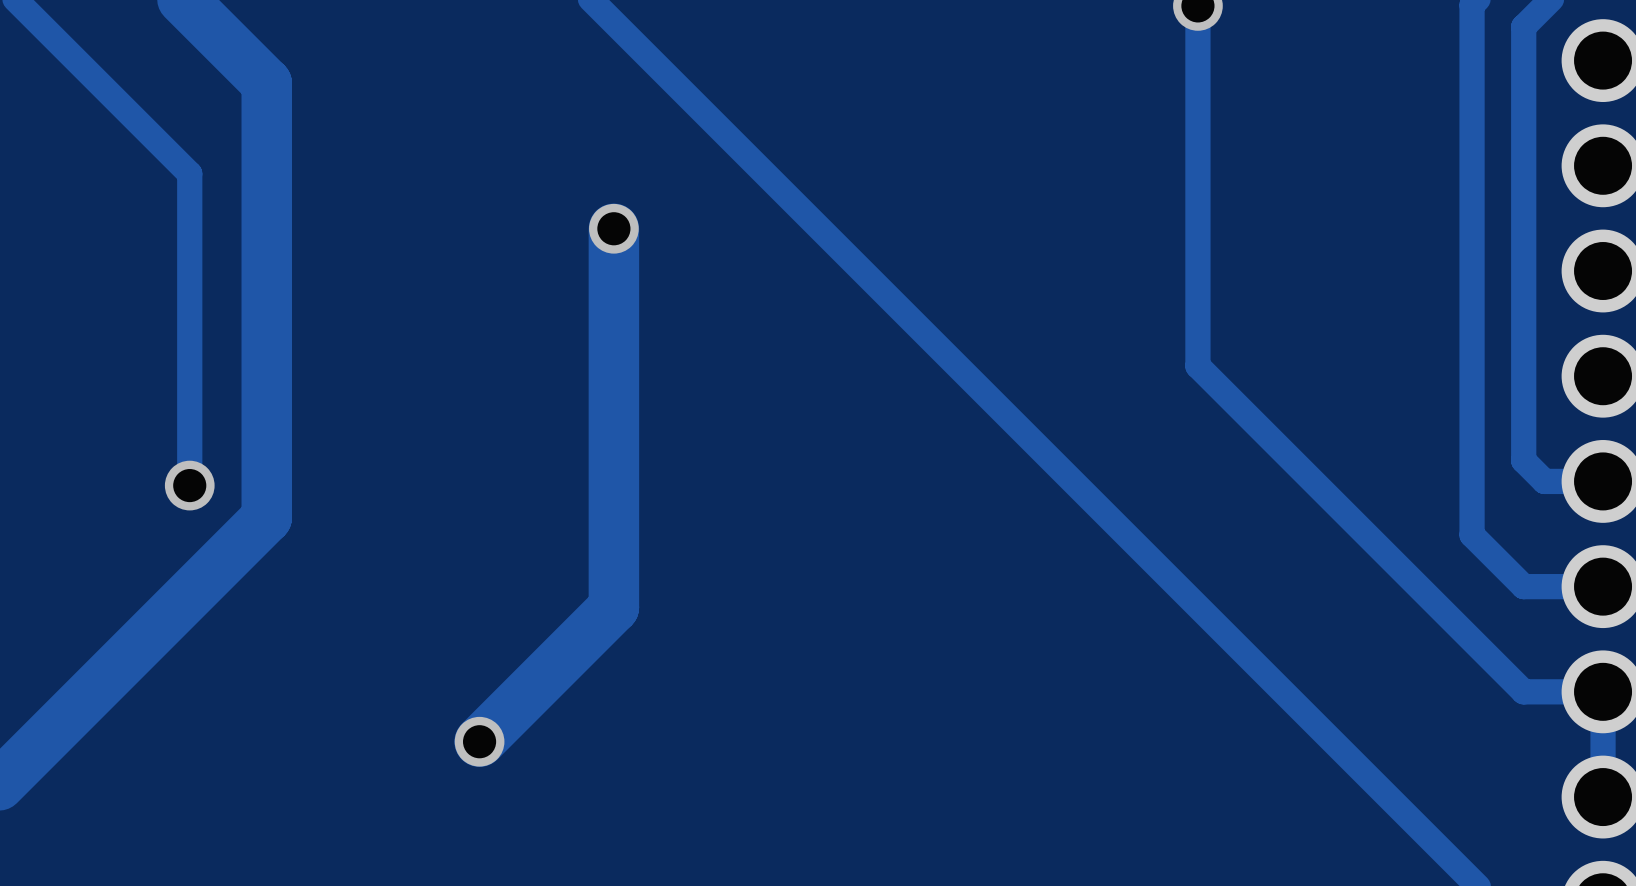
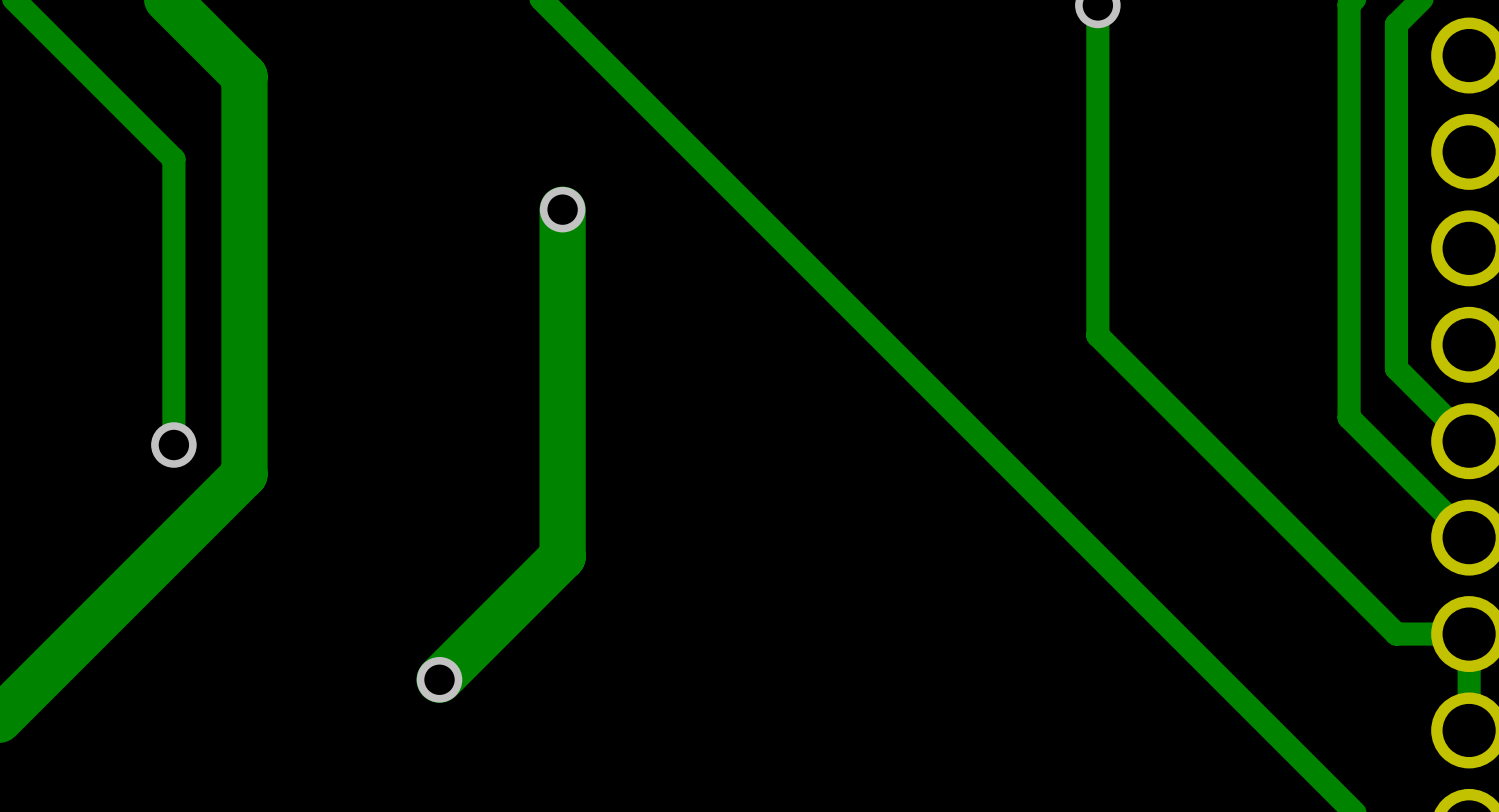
track: (1523, 402) (1523, 460) (1544, 481) (1603, 481) -> (1396, 368) (1469, 441)
track: (1472, 455) (1472, 534) (1523, 586) (1603, 586) -> (1349, 417) (1469, 537)

